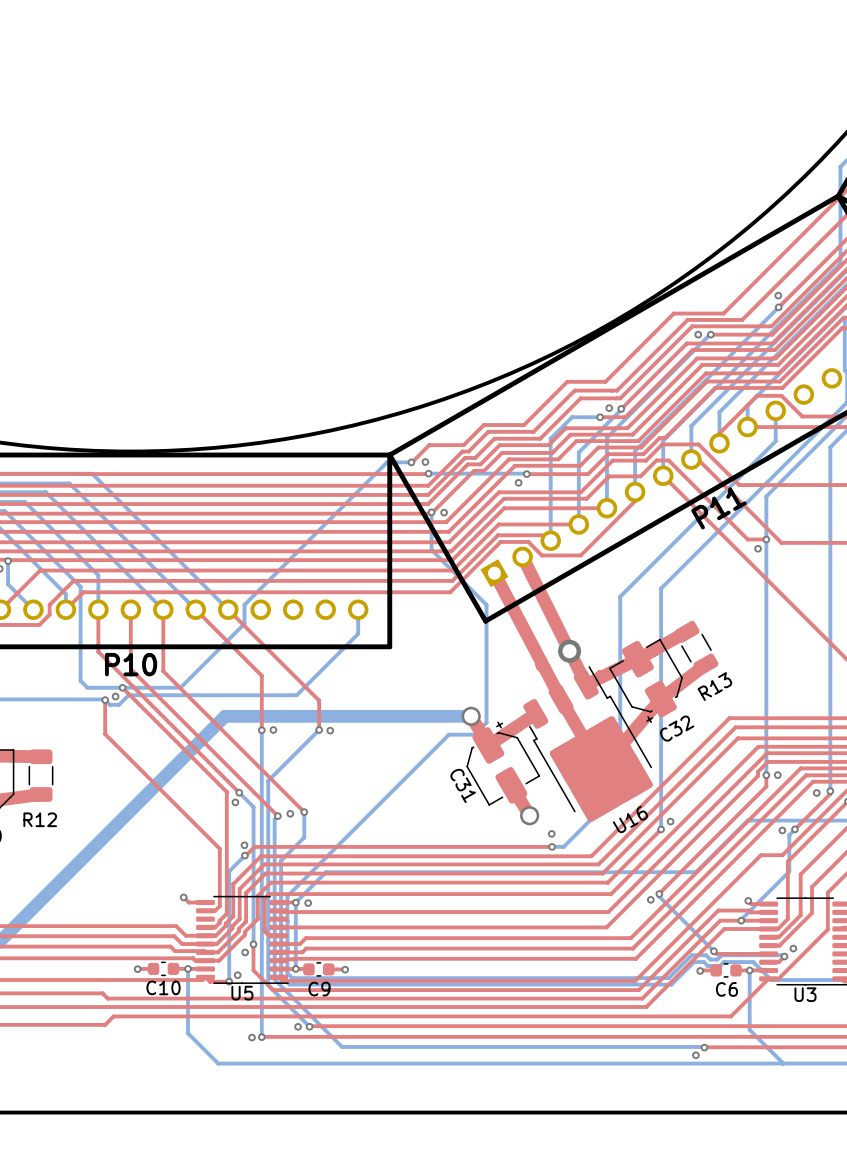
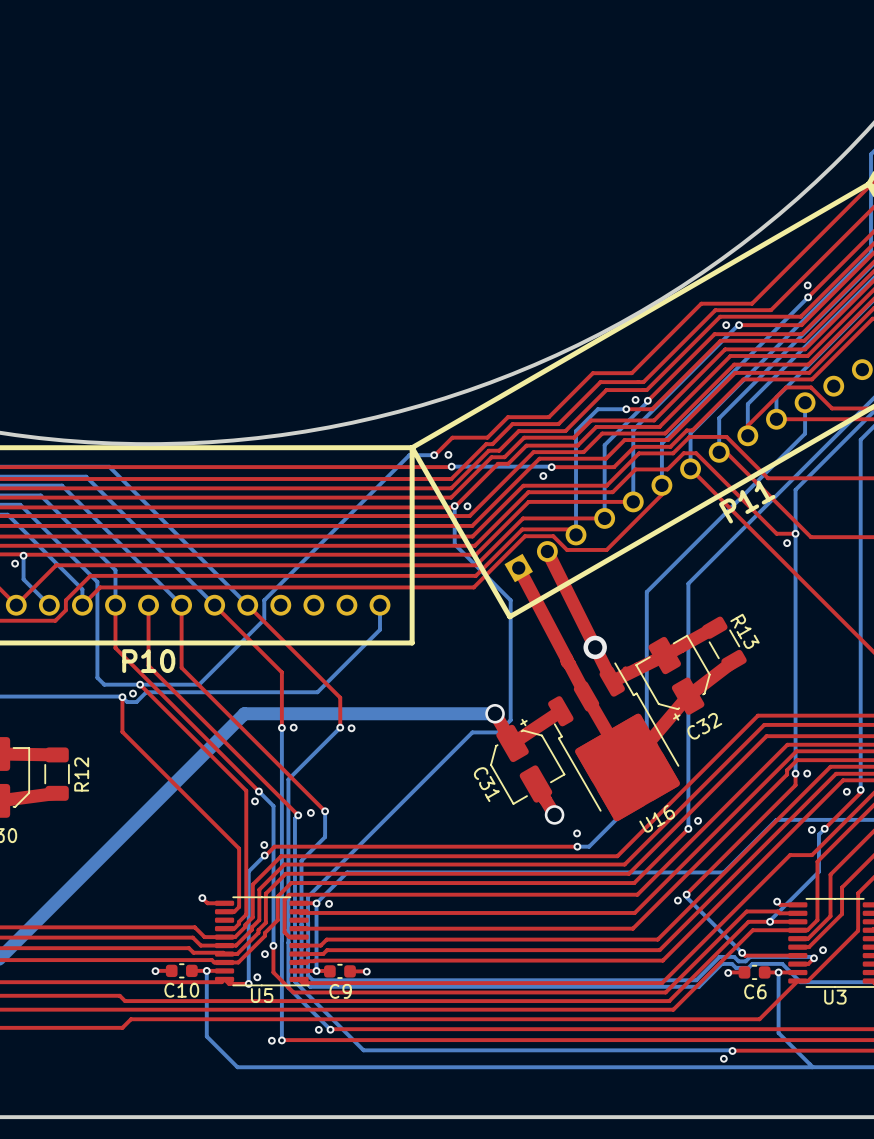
R13 name rotation: 0° (714, 686) -> 90° clockwise (744, 631)
R12 name rotation: 0° (40, 819) -> 90° counterclockwise (81, 774)
R12 name position: R12 (40, 819) -> R12 (81, 774)

